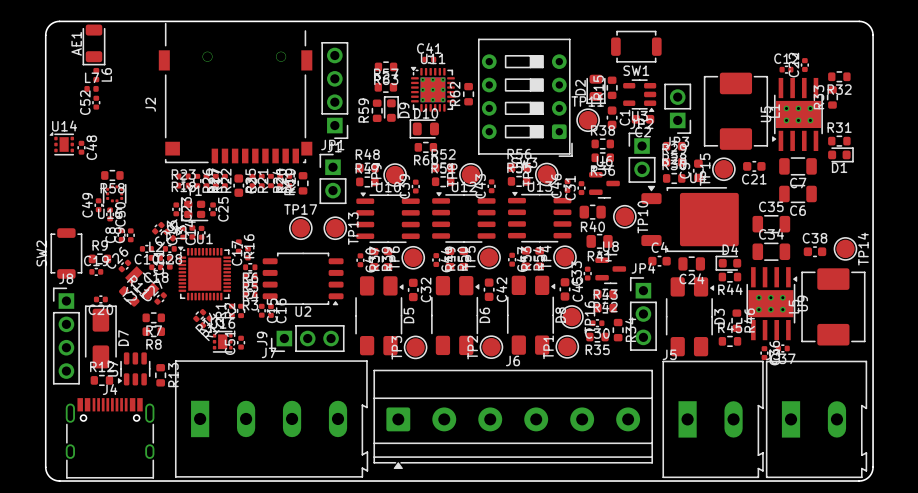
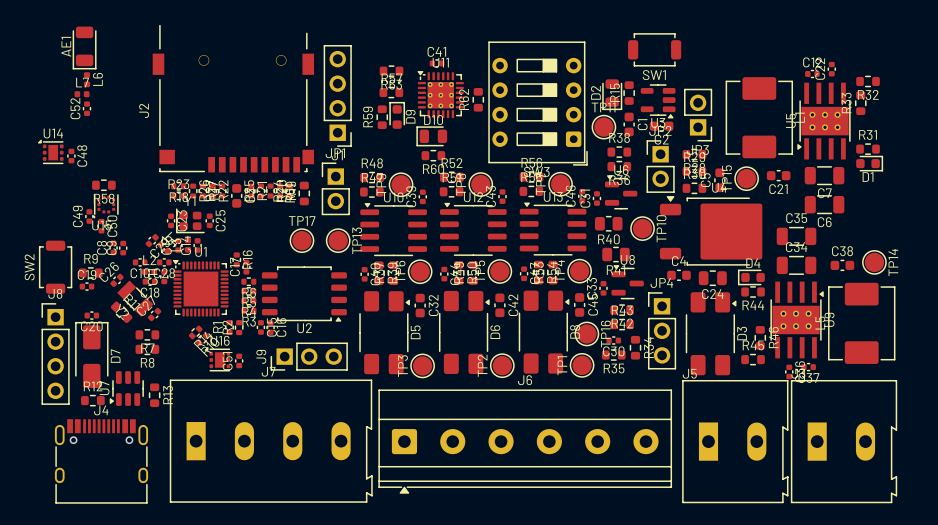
board edge: (59, 21) (859, 21) (866, 23) (871, 28) (873, 35) (873, 467) (871, 474) (866, 479) (859, 481) (59, 481) (52, 479) (47, 474) (45, 467) (45, 35) (49, 25) (59, 21) -> none

